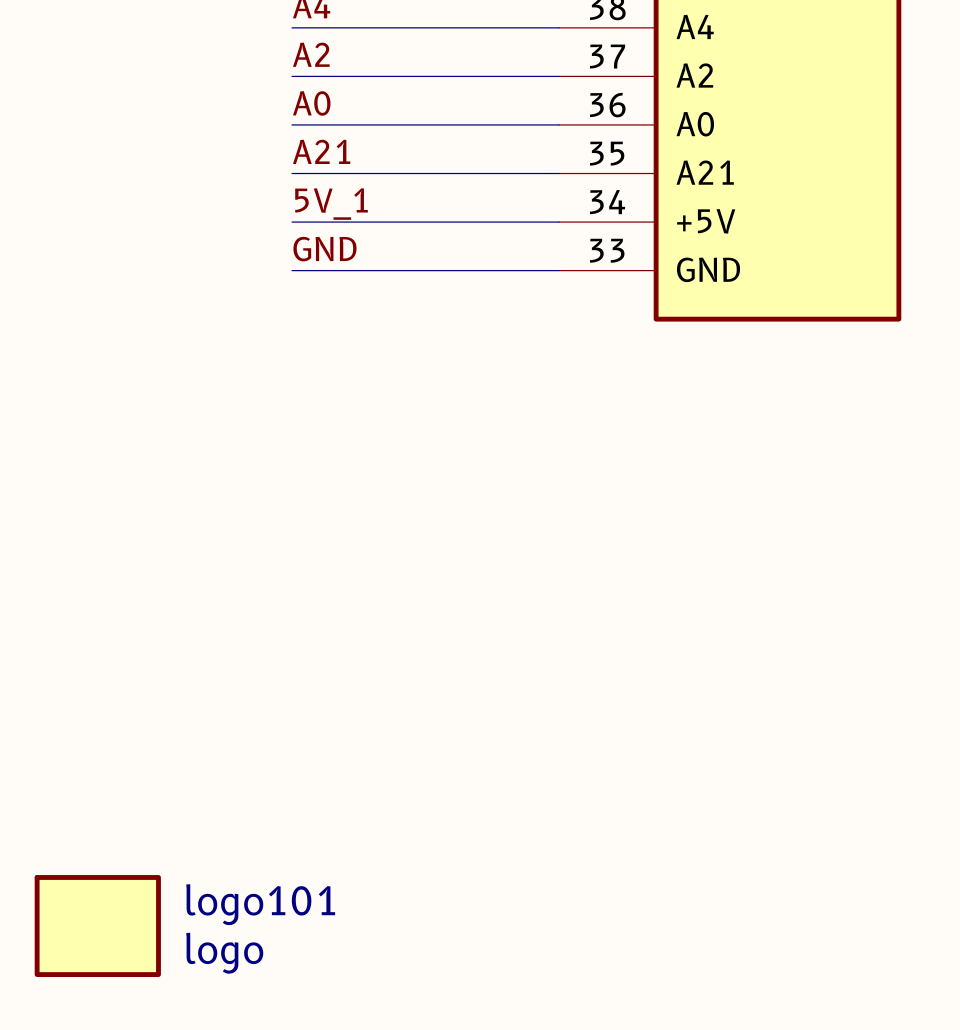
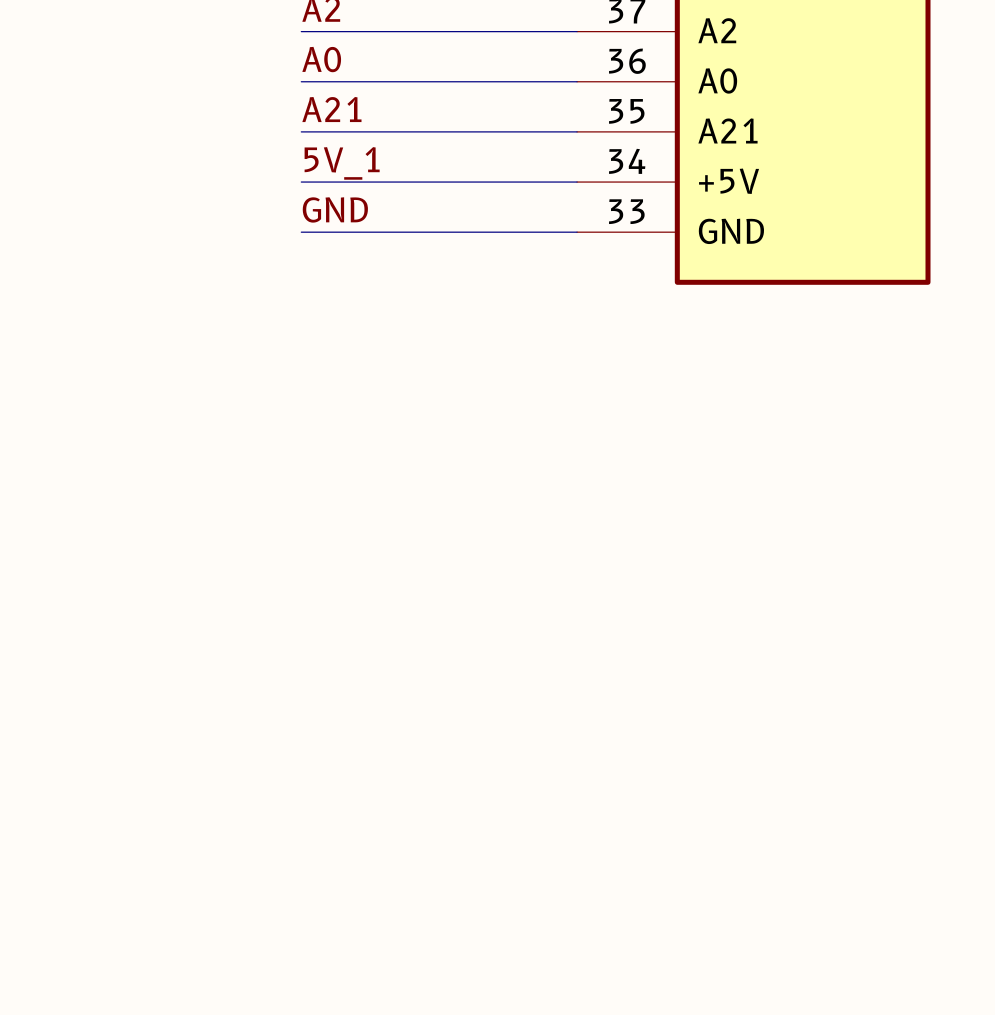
logo101: logo (97, 926) -> none

